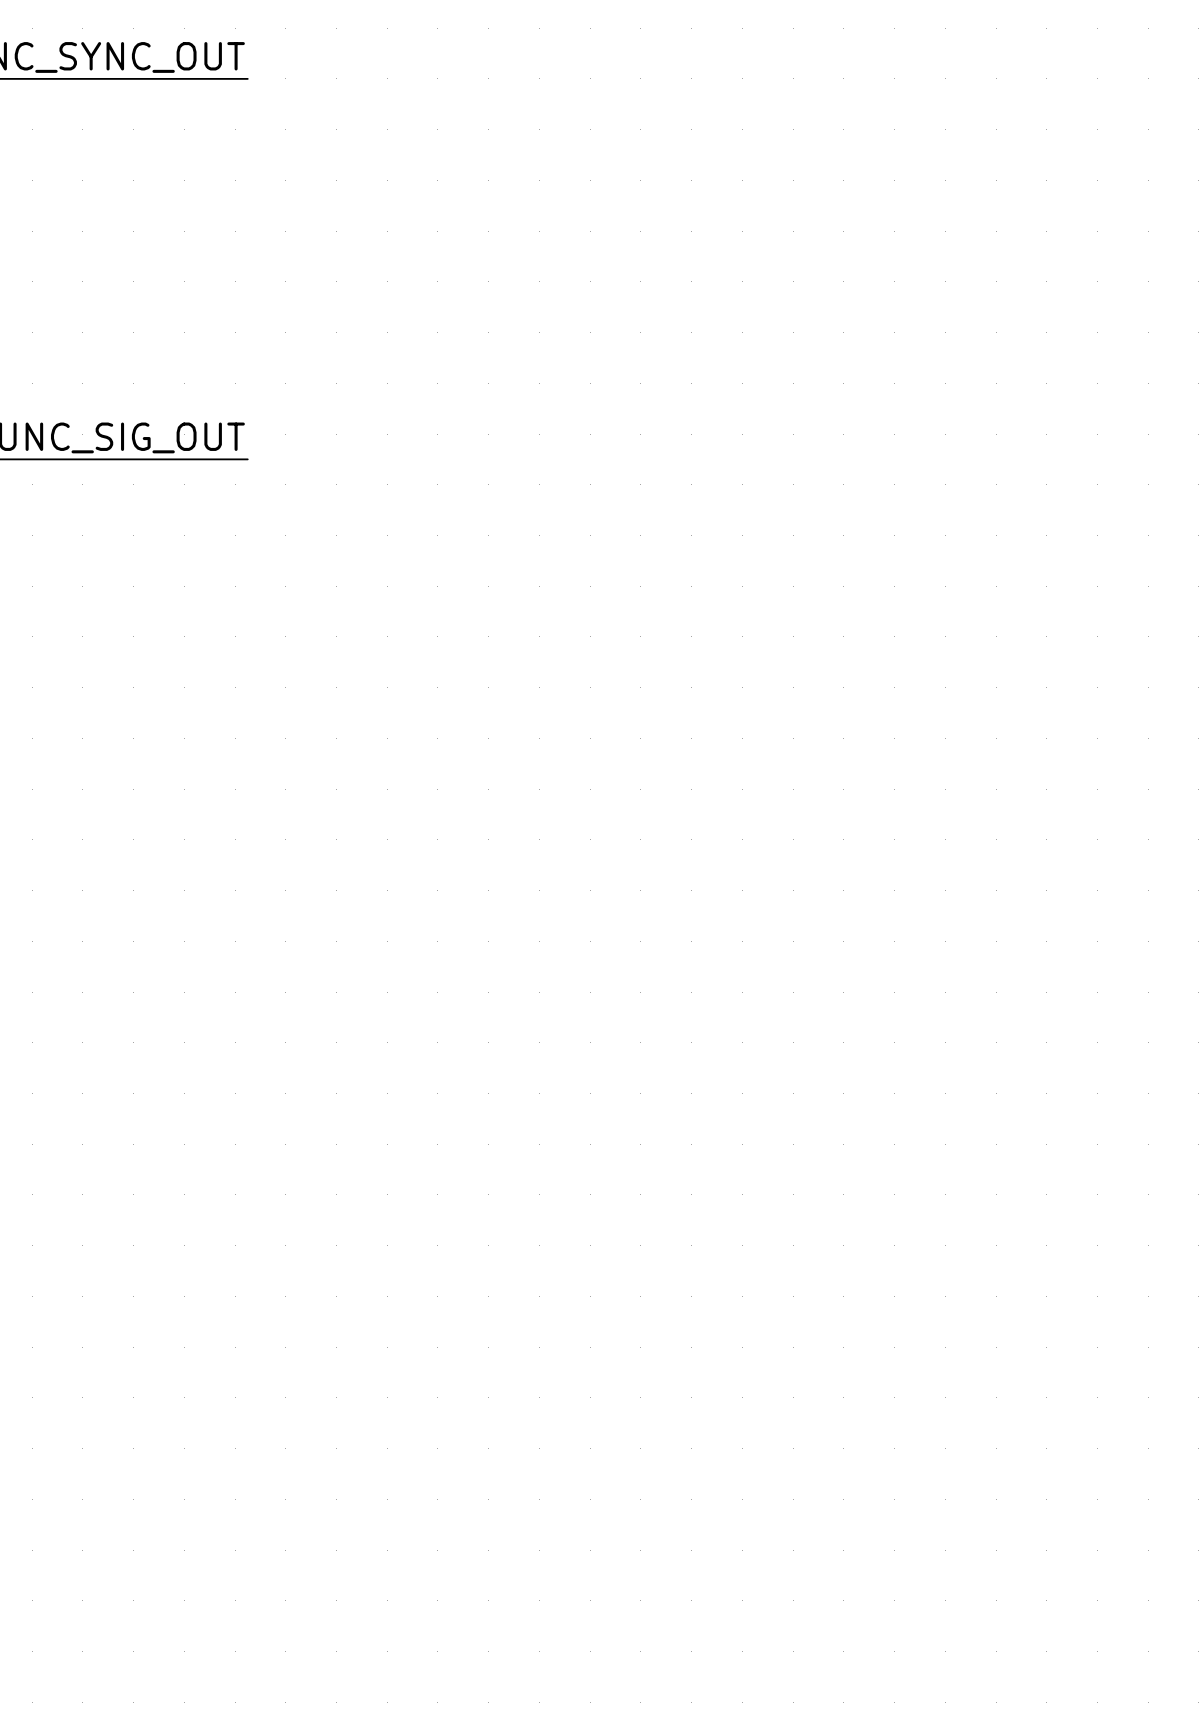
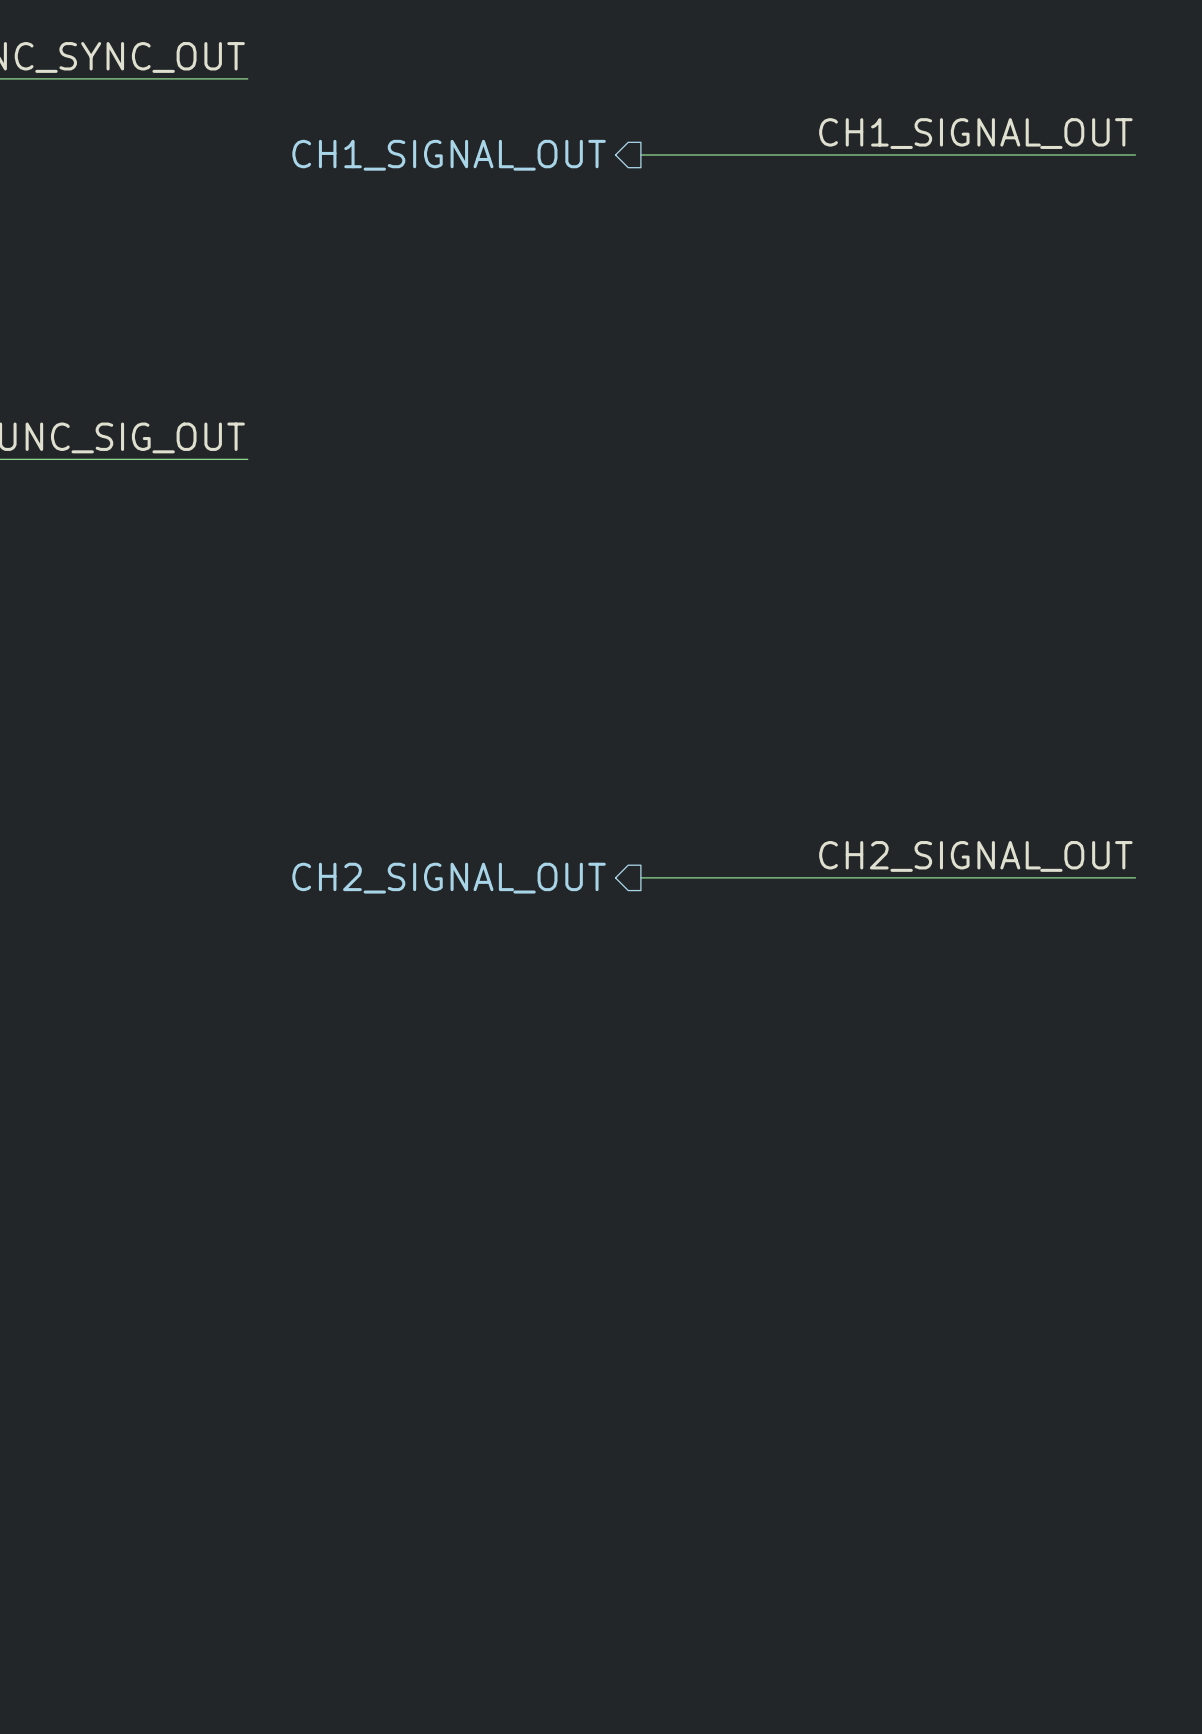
label: none -> CH1_SIGNAL_OUT (975, 133)
wire: none -> (640, 154) (1135, 154)
sheet pin: none -> CH1_SIGNAL_OUT (449, 155)
label: none -> CH2_SIGNAL_OUT (975, 856)
wire: none -> (640, 877) (1135, 877)
sheet pin: none -> CH2_SIGNAL_OUT (449, 878)

